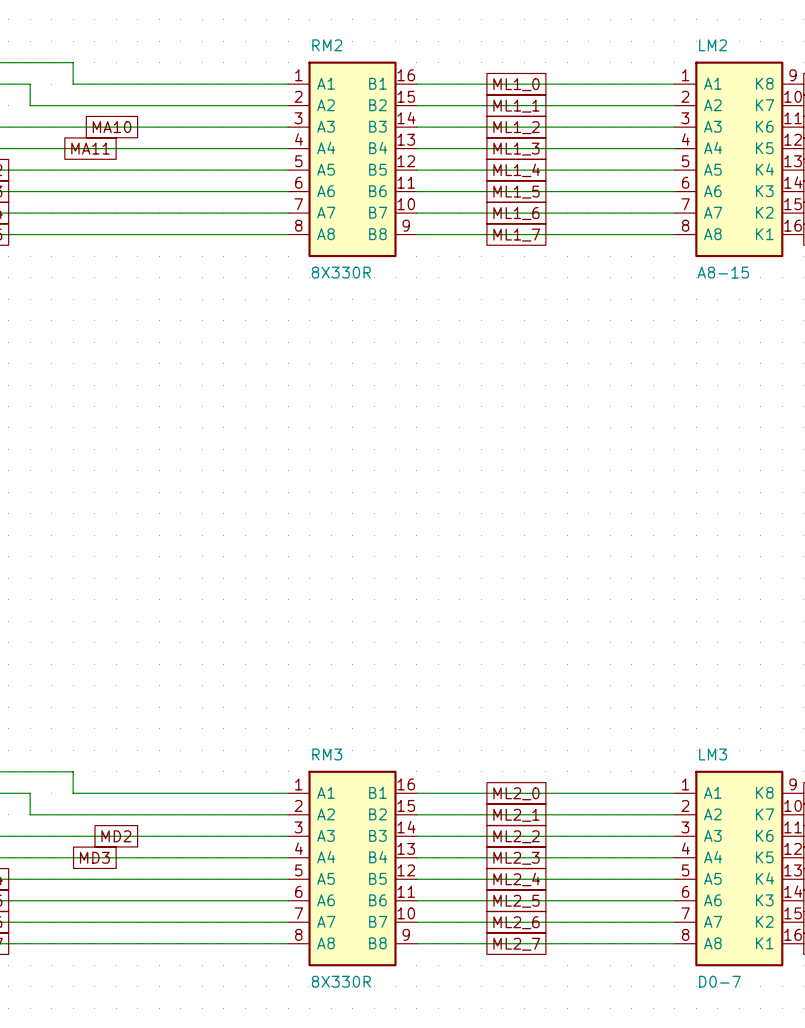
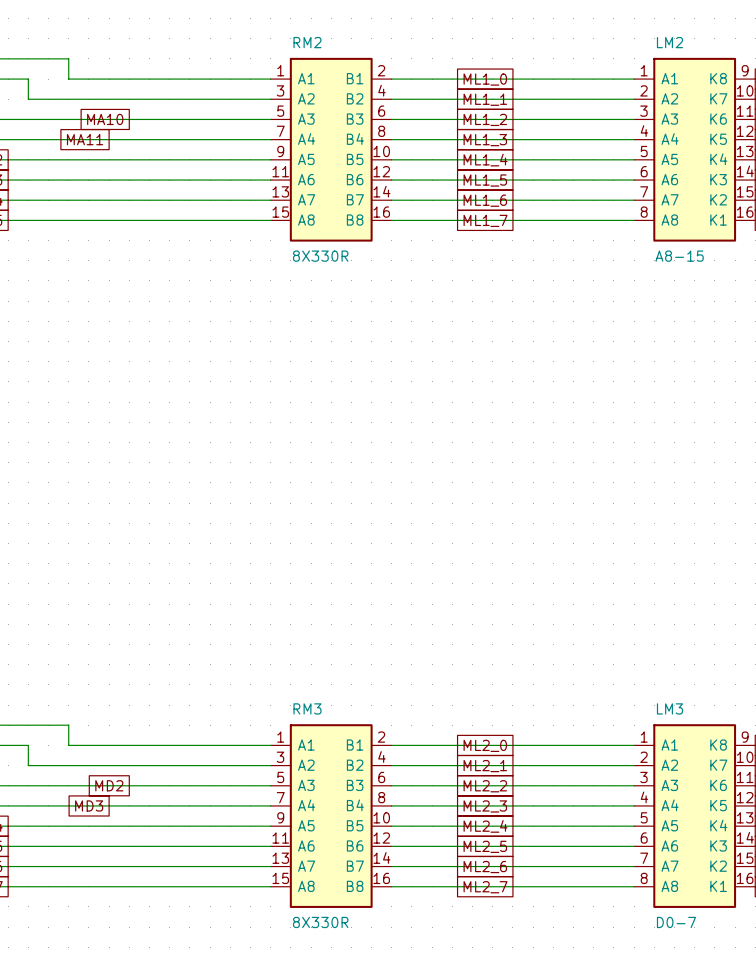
RM2 symbol: [288, 61, 417, 258] -> [270, 57, 392, 242]
RM3 symbol: [288, 770, 417, 967] -> [270, 724, 392, 908]

